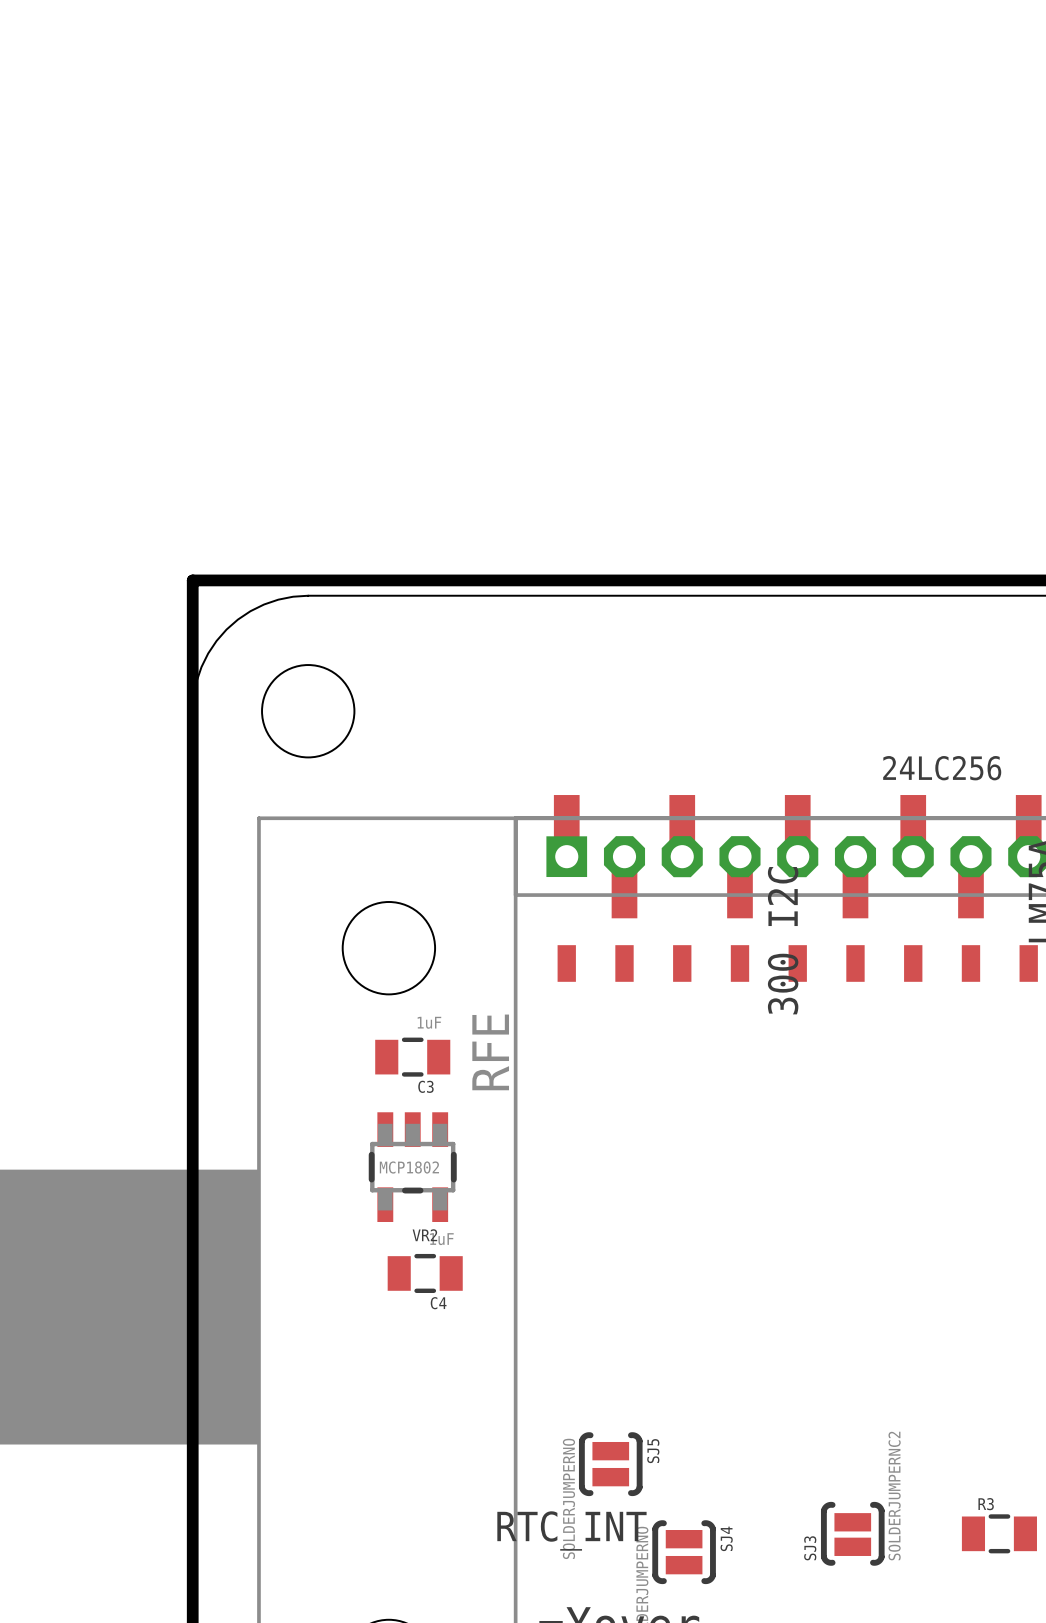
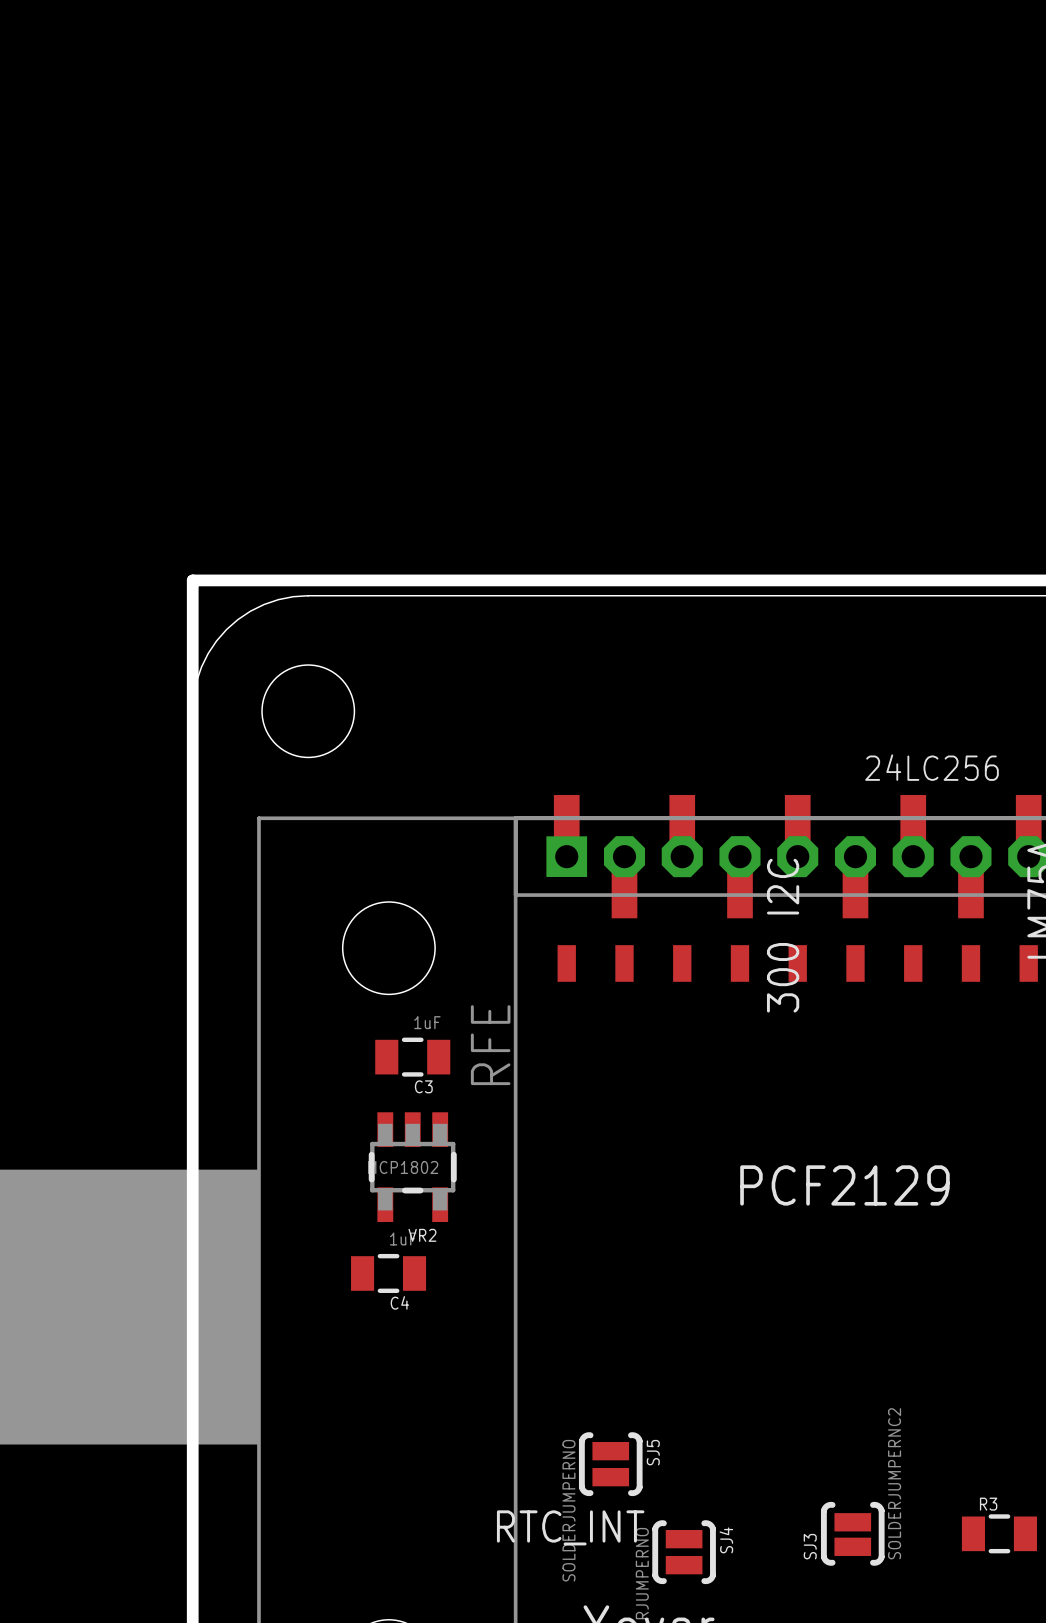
text: none -> PCF2129 (844, 1185)
C4 position: (425, 1273) -> (388, 1273)

